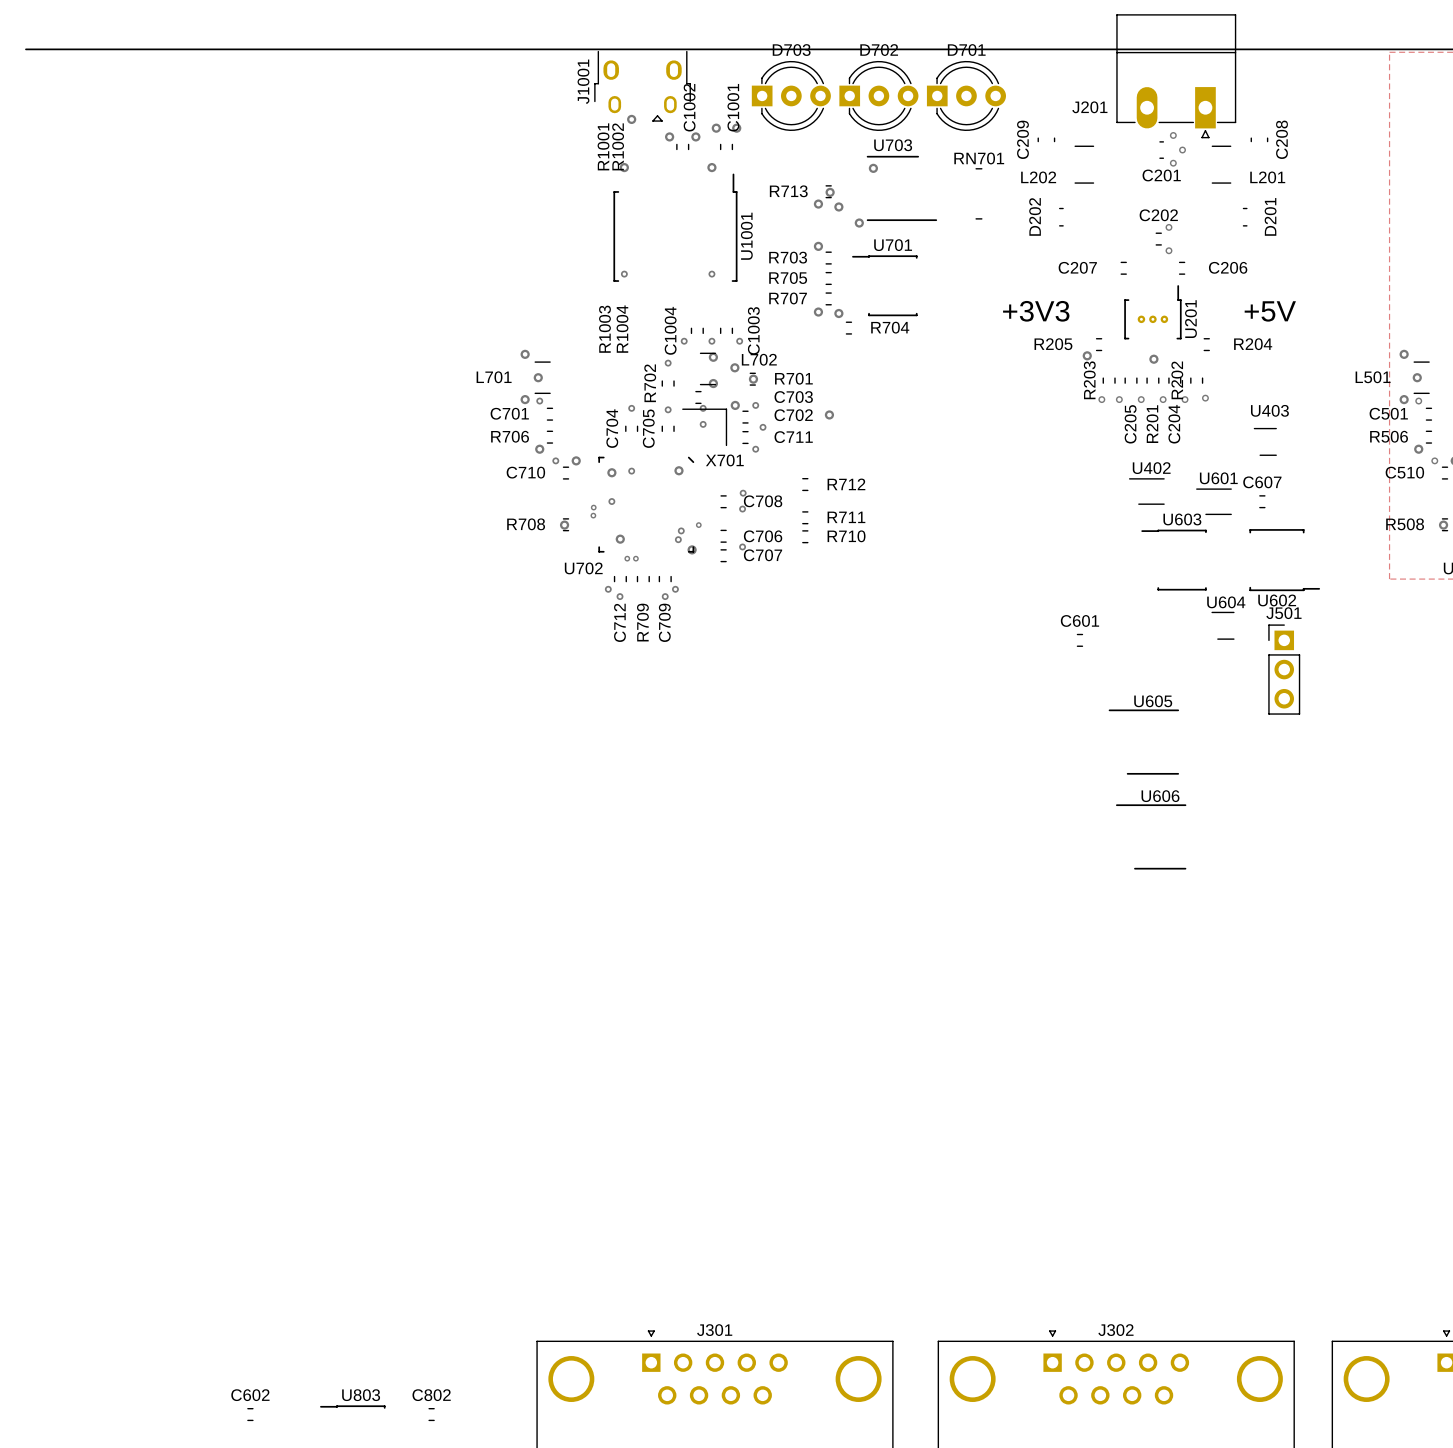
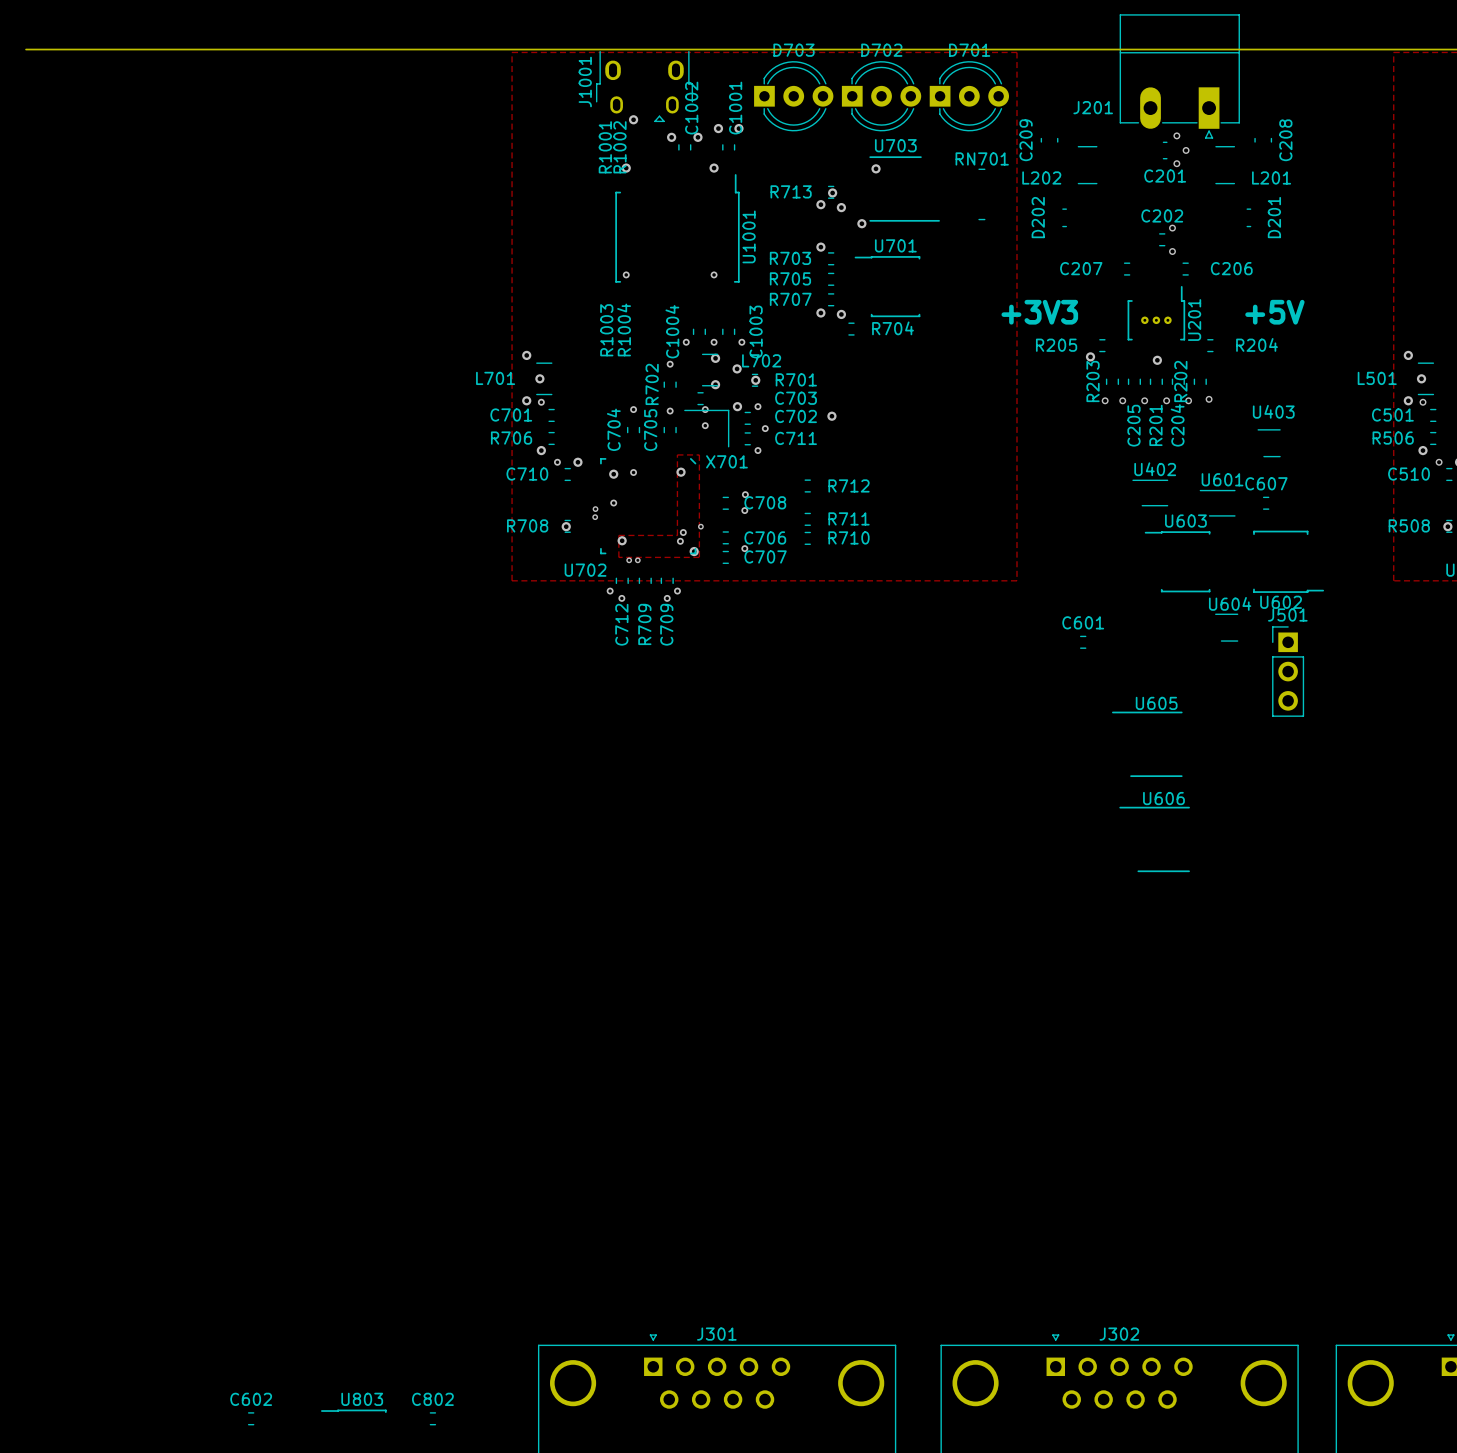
zone outline: none -> (512, 52) (1016, 52) (1016, 580) (512, 580) (512, 52)
zone outline: none -> (677, 454) (677, 535) (618, 535) (618, 557) (699, 557) (699, 454) (677, 454)

